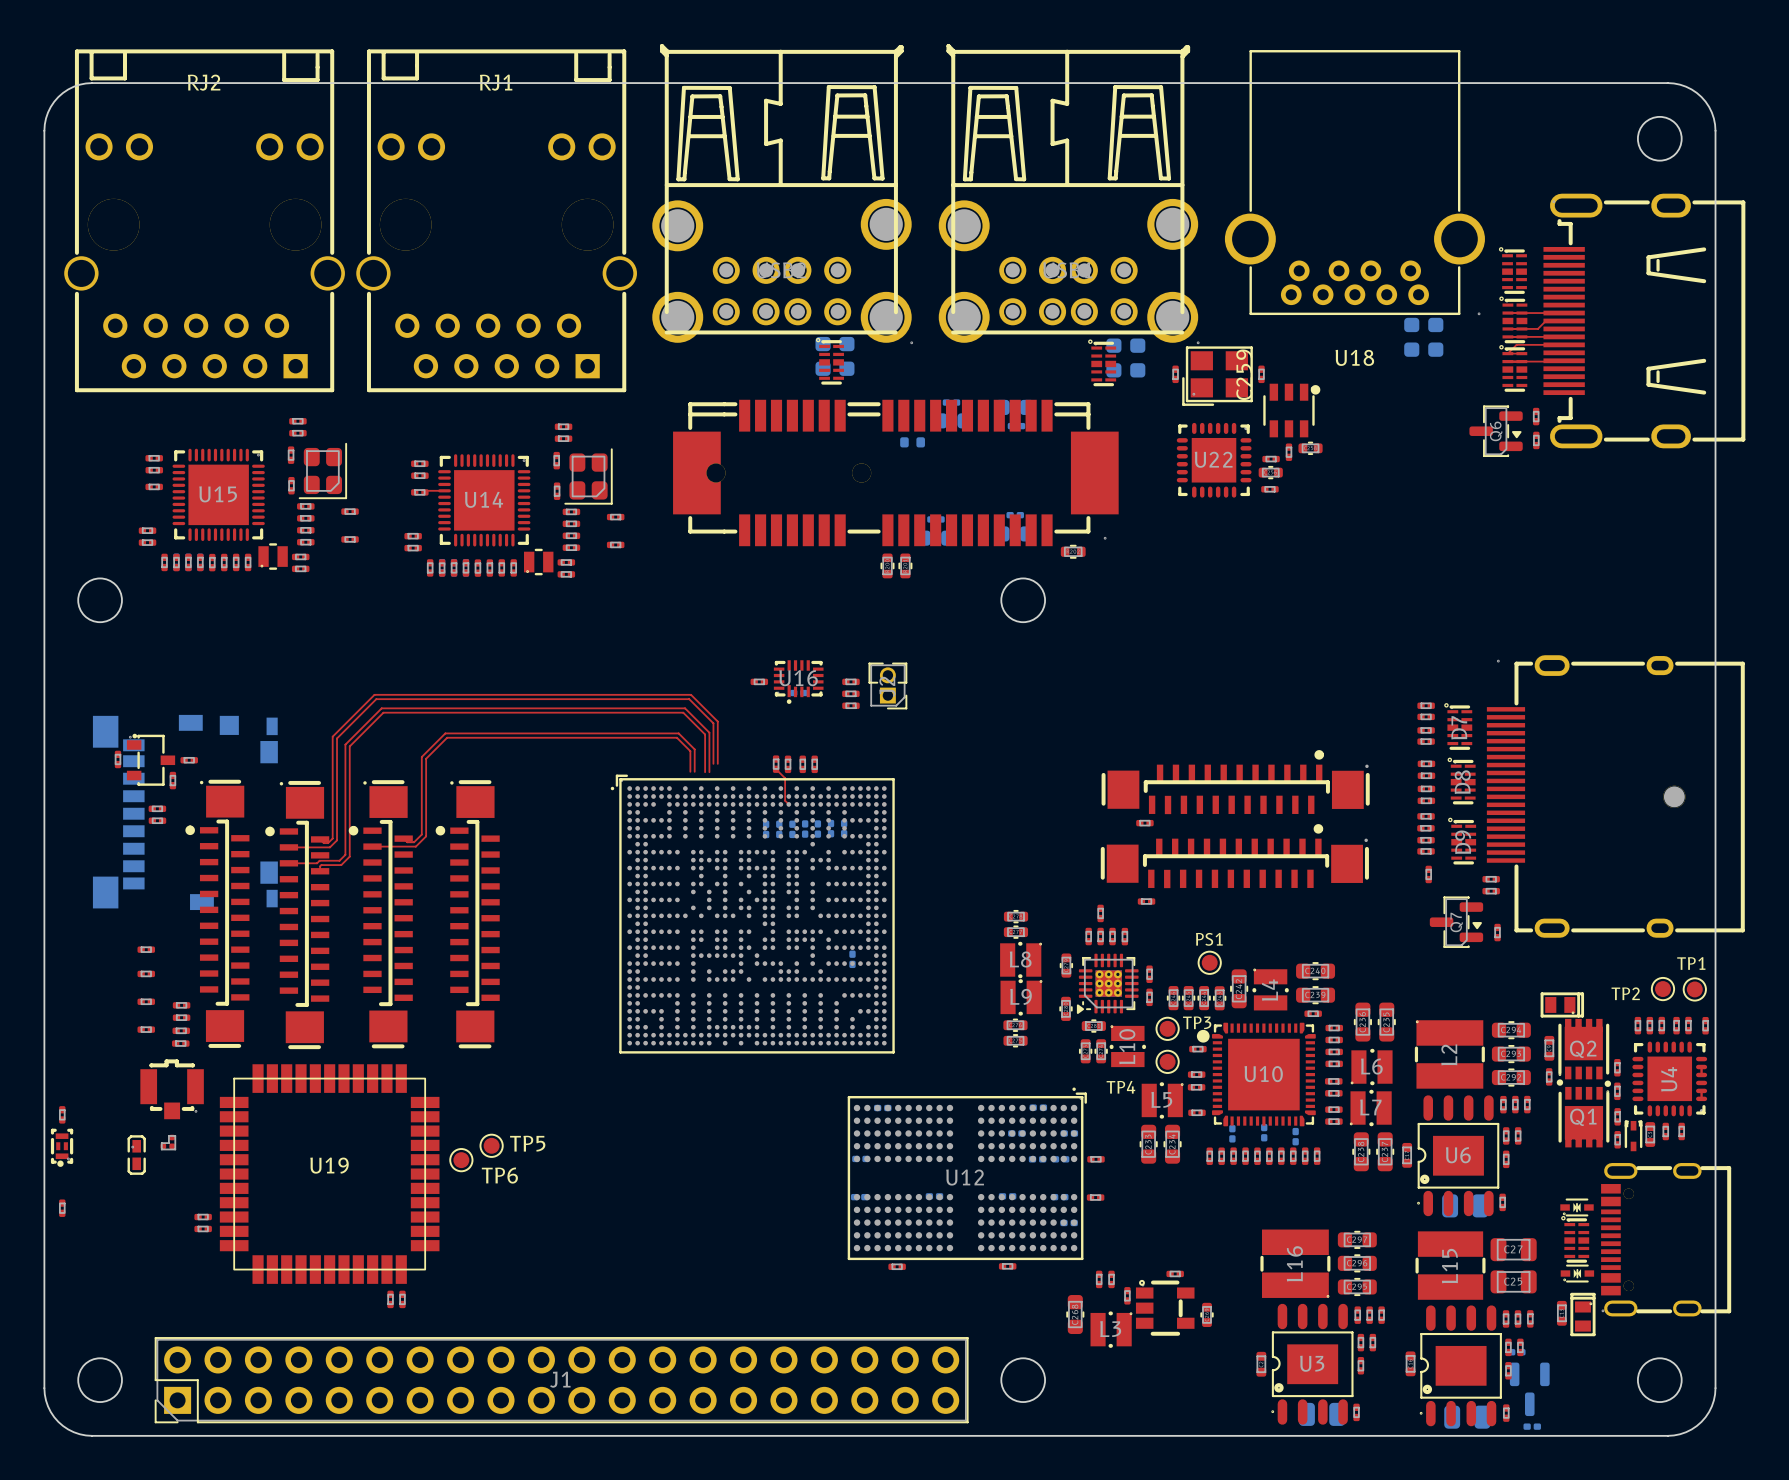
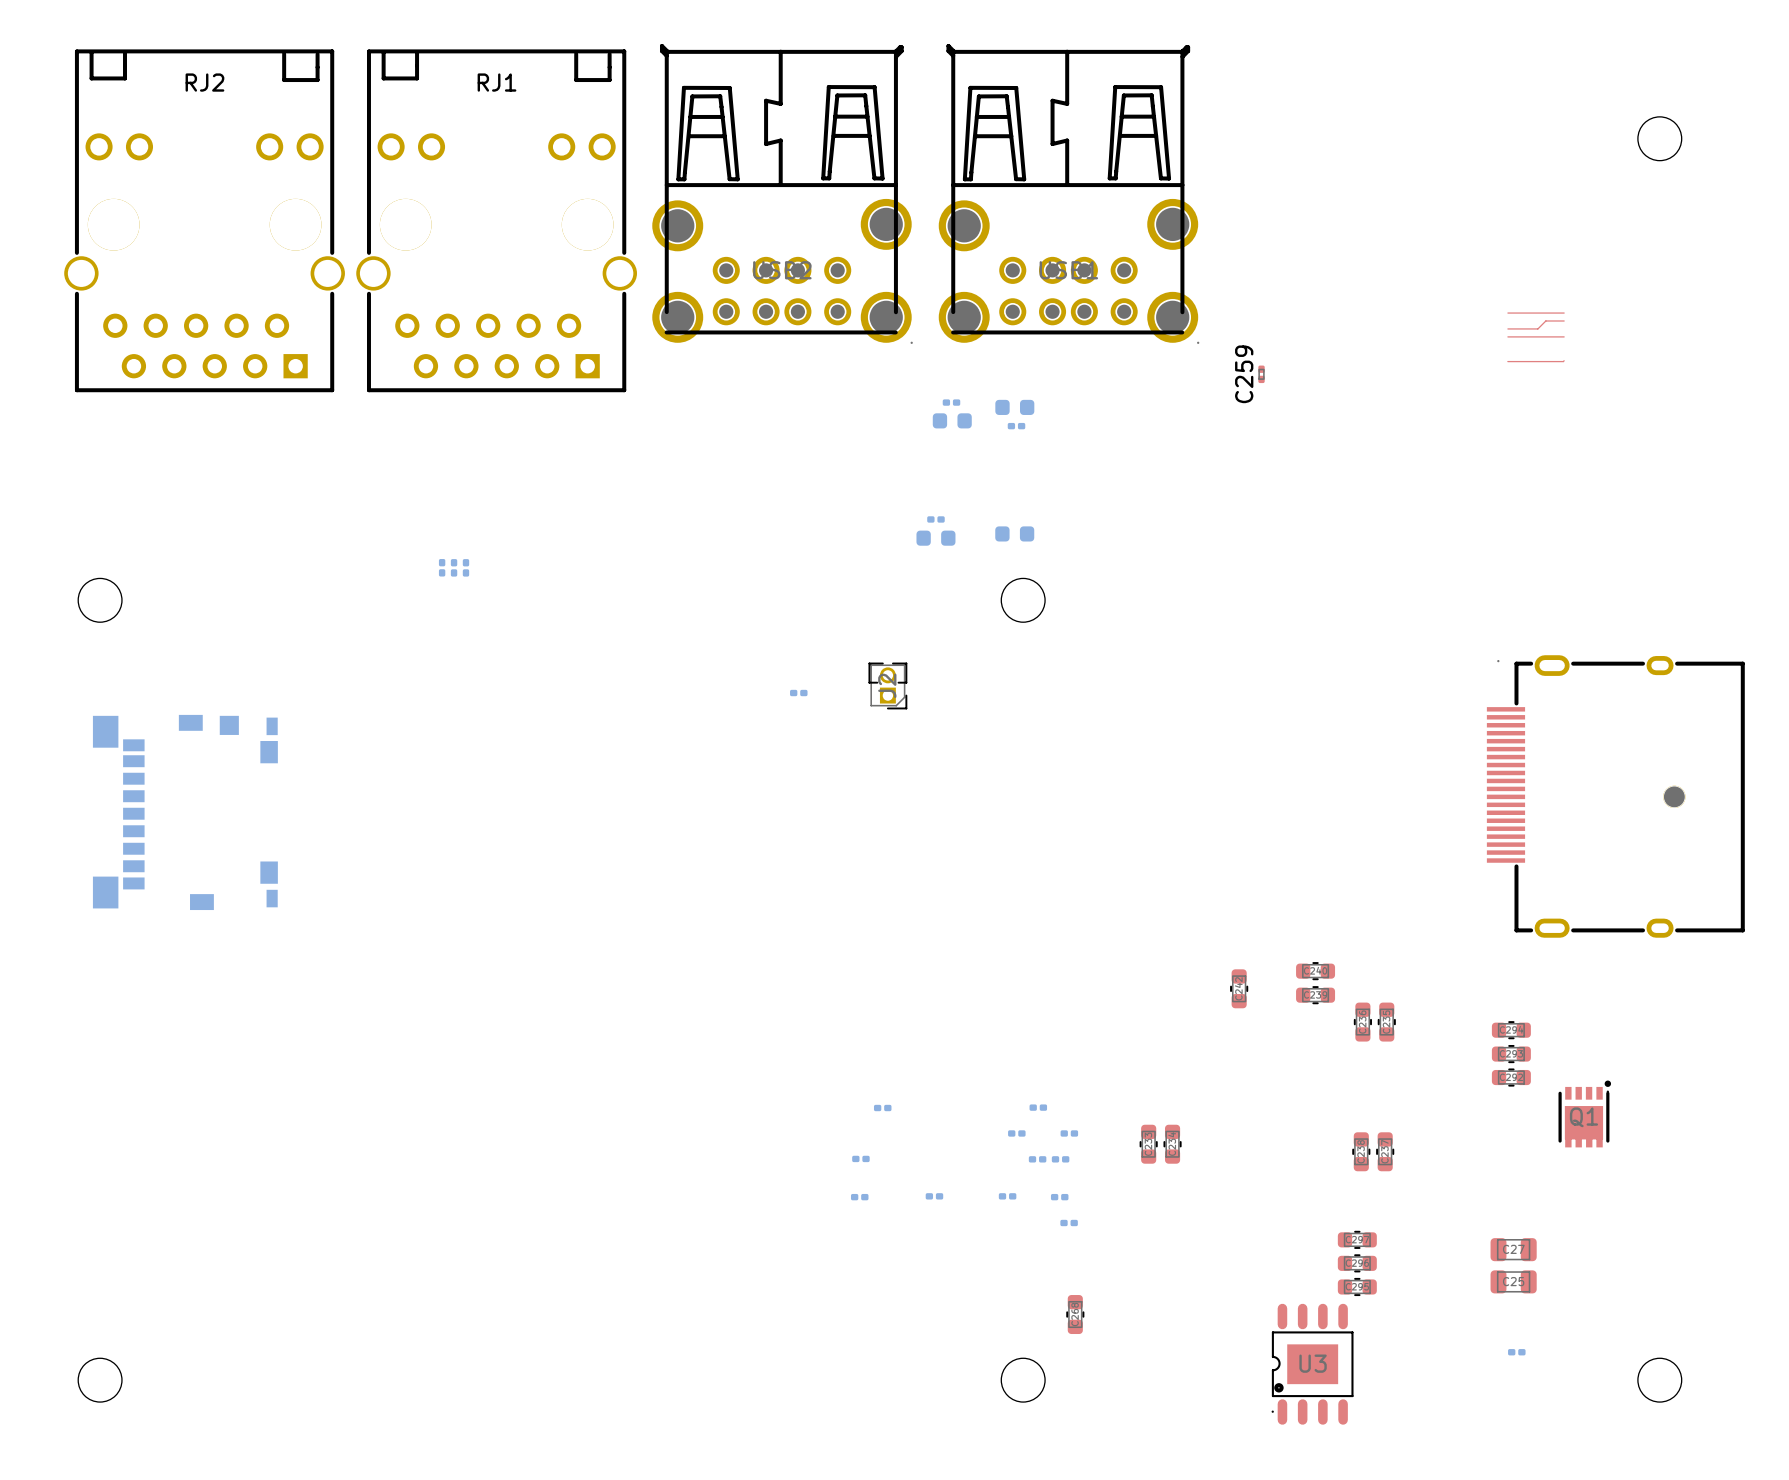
board edge: (92, 83) (1667, 83) (1686, 86) (1696, 92) (1709, 106) (1713, 118) (1715, 130) (1715, 1388) (1711, 1406) (1705, 1417) (1696, 1426) (1686, 1432) (1667, 1435) (92, 1435) (73, 1432) (63, 1426) (50, 1412) (46, 1400) (44, 1388) (44, 130) (48, 112) (58, 97) (73, 86) (92, 83) -> none
U18: (1354, 182) -> none
part: (1512, 270) -> none
part: (1513, 319) -> none
part: (1644, 321) -> none
part: (1411, 337) -> none
part: (1435, 337) -> none
top track: (1564, 344) (1516, 344) (1507, 353) (1521, 353) -> none
part: (823, 356) -> none
part: (846, 356) -> none
part: (1113, 358) -> none
part: (1137, 358) -> none
part: (829, 361) -> none
part: (1102, 362) -> none
part: (1513, 368) -> none
part: (1175, 374) -> none
part: (1217, 376) -> none
part: (1291, 410) -> none
part: (1536, 416) -> none
part: (297, 421) -> none
part: (563, 426) -> none
Q6: (1496, 431) -> none
part: (297, 433) -> none
part: (563, 438) -> none
part: (1536, 440) -> none
part: (912, 442) -> none
part: (1310, 448) -> none
part: (1288, 452) -> none
part: (291, 455) -> none
part: (154, 458) -> none
part: (1271, 459) -> none
part: (556, 460) -> none
U22: (1214, 460) -> none
part: (419, 463) -> none
part: (154, 470) -> none
part: (322, 471) -> none
part: (895, 472) -> none
part: (1270, 472) -> none
part: (419, 475) -> none
part: (588, 476) -> none
part: (291, 485) -> none
part: (154, 486) -> none
part: (1269, 489) -> none
top track: (444, 490) (424, 492) -> none
part: (557, 491) -> none
U15: (218, 492) -> none
part: (419, 492) -> none
U14: (484, 497) -> none
part: (305, 506) -> none
part: (350, 511) -> none
part: (571, 511) -> none
part: (1015, 515) -> none
part: (615, 517) -> none
part: (305, 518) -> none
part: (571, 523) -> none
part: (147, 530) -> none
part: (305, 530) -> none
part: (571, 535) -> none
part: (413, 536) -> none
part: (350, 539) -> none
part: (147, 542) -> none
part: (305, 542) -> none
part: (615, 544) -> none
part: (571, 547) -> none
part: (413, 548) -> none
part: (1073, 551) -> none
part: (273, 556) -> none
part: (300, 556) -> none
part: (164, 562) -> none
part: (176, 562) -> none
part: (188, 562) -> none
part: (200, 562) -> none
part: (212, 562) -> none
part: (224, 562) -> none
part: (236, 562) -> none
part: (248, 562) -> none
part: (538, 562) -> none
part: (566, 562) -> none
part: (887, 565) -> none
part: (905, 565) -> none
part: (430, 567) -> none
part: (454, 567) -> none
part: (465, 567) -> none
part: (501, 567) -> none
part: (513, 567) -> none
part: (300, 568) -> none
part: (442, 568) -> none
part: (477, 568) -> none
part: (489, 568) -> none
part: (566, 574) -> none
part: (759, 681) -> none
part: (850, 681) -> none
U16: (798, 682) -> none
part: (850, 693) -> none
part: (850, 705) -> none
part: (1426, 705) -> none
part: (1426, 716) -> none
D7: (1458, 726) -> none
part: (1426, 730) -> none
part: (1426, 741) -> none
part: (117, 759) -> none
part: (151, 759) -> none
part: (189, 760) -> none
top track: (713, 763) (713, 723) (689, 699) (376, 699) (337, 738) (337, 840) (329, 847) (288, 847) -> none
top track: (717, 763) (717, 721) (691, 694) (374, 694) (332, 736) (332, 838) (328, 843) (323, 843) (320, 839) -> none
part: (1426, 763) -> none
part: (776, 764) -> none
part: (788, 764) -> none
part: (802, 764) -> none
part: (814, 764) -> none
top track: (776, 769) (785, 778) (785, 800) (788, 804) -> none
top track: (690, 771) (690, 751) (676, 737) (447, 737) (426, 758) (426, 836) (415, 846) (372, 846) -> none
top track: (694, 771) (694, 749) (678, 733) (445, 733) (421, 756) (421, 834) (414, 842) (407, 842) (403, 838) -> none
top track: (705, 772) (705, 734) (683, 712) (383, 712) (349, 746) (349, 856) (341, 865) (321, 865) (320, 871) -> none
top track: (709, 772) (709, 732) (685, 708) (381, 708) (345, 744) (345, 854) (339, 860) (288, 863) -> none
part: (1426, 775) -> none
part: (172, 780) -> none
D8: (1461, 781) -> none
part: (1235, 782) -> none
part: (1426, 788) -> none
part: (1426, 800) -> none
part: (157, 808) -> none
part: (1426, 816) -> none
part: (157, 820) -> none
part: (1144, 823) -> none
part: (831, 828) -> none
part: (844, 828) -> none
part: (1425, 828) -> none
part: (766, 829) -> none
part: (779, 829) -> none
part: (792, 829) -> none
part: (805, 829) -> none
part: (817, 829) -> none
part: (1426, 840) -> none
D9: (1462, 841) -> none
part: (1426, 851) -> none
part: (1234, 856) -> none
part: (1428, 874) -> none
part: (1491, 879) -> none
part: (1491, 891) -> none
part: (1146, 901) -> none
part: (217, 913) -> none
part: (1100, 913) -> none
part: (380, 914) -> none
part: (467, 914) -> none
part: (752, 914) -> none
part: (297, 915) -> none
part: (1016, 916) -> none
Q7: (1456, 922) -> none
part: (1015, 932) -> none
part: (1497, 932) -> none
part: (1088, 936) -> none
part: (1100, 936) -> none
part: (1112, 936) -> none
part: (1124, 936) -> none
part: (146, 949) -> none
part: (852, 959) -> none
L8: (1020, 960) -> none
PS1: (1209, 962) -> none
part: (1066, 965) -> none
part: (146, 973) -> none
part: (1149, 974) -> none
part: (1107, 983) -> none
L4: (1270, 989) -> none
TP2: (1662, 989) -> none
TP1: (1694, 989) -> none
L9: (1021, 997) -> none
part: (1149, 997) -> none
part: (1173, 998) -> none
part: (1188, 998) -> none
part: (1204, 998) -> none
part: (1219, 998) -> none
part: (146, 1001) -> none
part: (1562, 1004) -> none
part: (181, 1005) -> none
part: (1065, 1008) -> none
part: (1313, 1013) -> none
part: (181, 1017) -> none
part: (1015, 1025) -> none
part: (1637, 1025) -> none
part: (1649, 1025) -> none
part: (1661, 1025) -> none
part: (1676, 1025) -> none
part: (1688, 1025) -> none
part: (1705, 1025) -> none
part: (1093, 1026) -> none
TP3: (1167, 1028) -> none
part: (1334, 1028) -> none
part: (146, 1029) -> none
part: (181, 1030) -> none
part: (1334, 1039) -> none
part: (1015, 1040) -> none
part: (180, 1043) -> none
L10: (1127, 1046) -> none
part: (1549, 1048) -> none
part: (1197, 1049) -> none
part: (1085, 1051) -> none
part: (1101, 1051) -> none
part: (1334, 1051) -> none
Q2: (1583, 1052) -> none
L2: (1449, 1054) -> none
TP4: (1167, 1061) -> none
part: (1334, 1063) -> none
L6: (1371, 1067) -> none
part: (1617, 1067) -> none
top track: (1701, 1067) (1701, 1074) -> none
part: (1196, 1074) -> none
U10: (1256, 1074) -> none
part: (1549, 1076) -> none
U4: (1669, 1078) -> none
part: (1333, 1081) -> none
part: (1196, 1087) -> none
part: (172, 1089) -> none
top track: (1701, 1090) (1701, 1098) -> none
part: (1617, 1091) -> none
part: (1333, 1093) -> none
L5: (1162, 1100) -> none
part: (1503, 1104) -> none
part: (1515, 1104) -> none
part: (1527, 1104) -> none
L7: (1370, 1108) -> none
part: (1333, 1109) -> none
part: (1196, 1112) -> none
part: (62, 1114) -> none
part: (1617, 1116) -> none
part: (1333, 1121) -> none
part: (1665, 1131) -> none
part: (1681, 1131) -> none
part: (1264, 1132) -> none
part: (1232, 1133) -> none
part: (1650, 1134) -> none
part: (1506, 1135) -> none
part: (1518, 1135) -> none
part: (1633, 1135) -> none
part: (1295, 1136) -> none
part: (1617, 1139) -> none
part: (168, 1142) -> none
TP5: (491, 1145) -> none
part: (62, 1147) -> none
part: (136, 1155) -> none
part: (1407, 1155) -> none
U6: (1458, 1155) -> none
part: (1209, 1156) -> none
part: (1221, 1156) -> none
part: (1233, 1156) -> none
part: (1245, 1156) -> none
part: (1257, 1156) -> none
part: (1269, 1156) -> none
part: (1281, 1156) -> none
part: (1293, 1156) -> none
part: (1305, 1156) -> none
part: (1317, 1156) -> none
part: (1096, 1159) -> none
part: (1506, 1159) -> none
TP6: (461, 1160) -> none
U12: (967, 1173) -> none
U19: (329, 1174) -> none
part: (1095, 1197) -> none
part: (1502, 1202) -> none
part: (1465, 1205) -> none
part: (1577, 1207) -> none
part: (62, 1208) -> none
part: (203, 1217) -> none
part: (203, 1228) -> none
part: (1575, 1239) -> none
part: (1666, 1239) -> none
L16: (1295, 1263) -> none
L15: (1450, 1265) -> none
part: (897, 1266) -> none
part: (1007, 1266) -> none
part: (1175, 1273) -> none
part: (1577, 1273) -> none
part: (1099, 1279) -> none
part: (1111, 1279) -> none
part: (1127, 1295) -> none
part: (390, 1299) -> none
part: (402, 1299) -> none
part: (1165, 1307) -> none
part: (1561, 1313) -> none
part: (1207, 1314) -> none
part: (1582, 1314) -> none
part: (1357, 1315) -> none
part: (1369, 1315) -> none
part: (1381, 1315) -> none
part: (1506, 1318) -> none
part: (1517, 1318) -> none
part: (1530, 1318) -> none
L3: (1111, 1329) -> none
part: (1360, 1342) -> none
part: (1372, 1342) -> none
part: (1508, 1347) -> none
part: (1520, 1347) -> none
part: (1410, 1363) -> none
part: (1261, 1364) -> none
part: (1360, 1365) -> none
part: (1461, 1365) -> none
part: (1508, 1370) -> none
J1: (561, 1380) -> none
part: (1529, 1389) -> none
part: (1356, 1412) -> none
part: (1506, 1413) -> none
part: (1322, 1414) -> none
part: (1467, 1417) -> none
part: (1532, 1426) -> none

